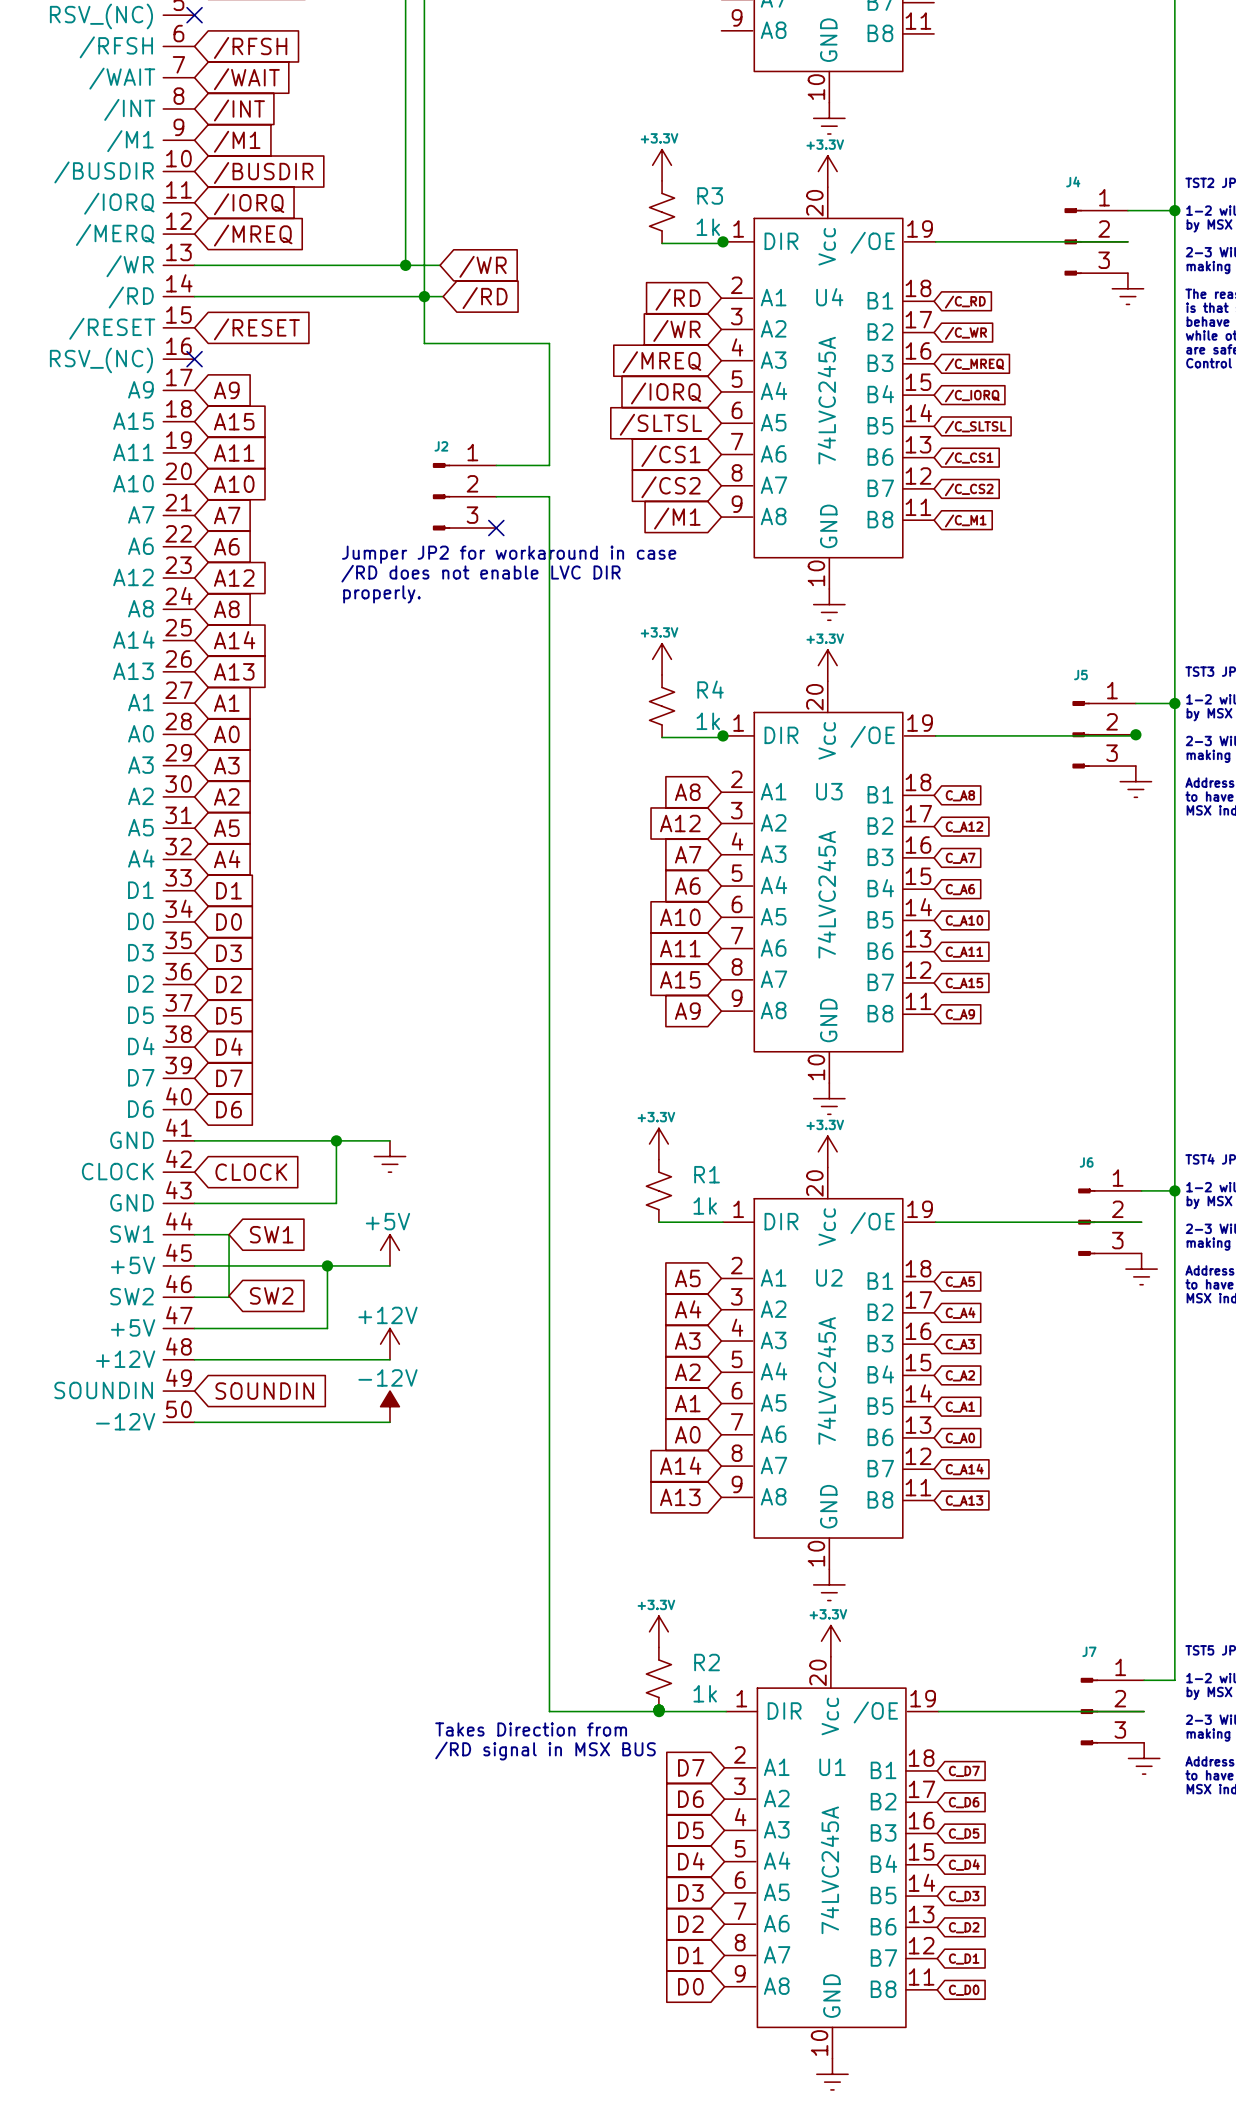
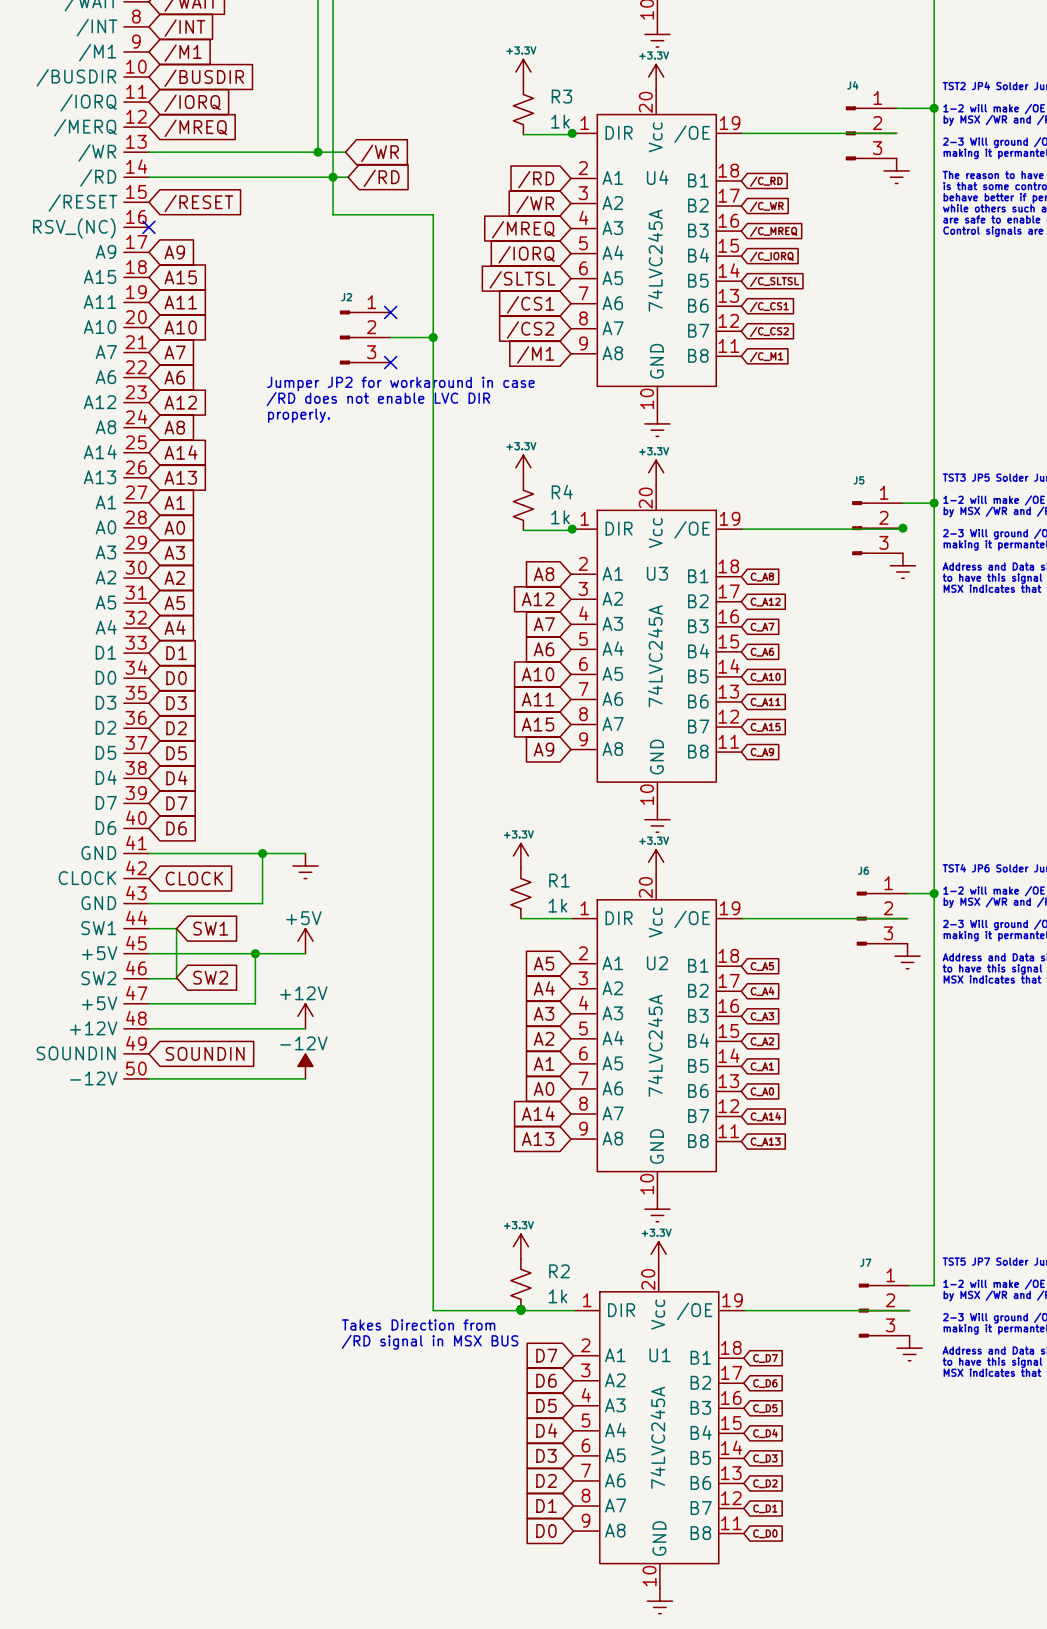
wire: (496, 465) (549, 465) -> (433, 337) (433, 312)
no-connect mark: none -> (390, 312)
junction: none -> (433, 337)

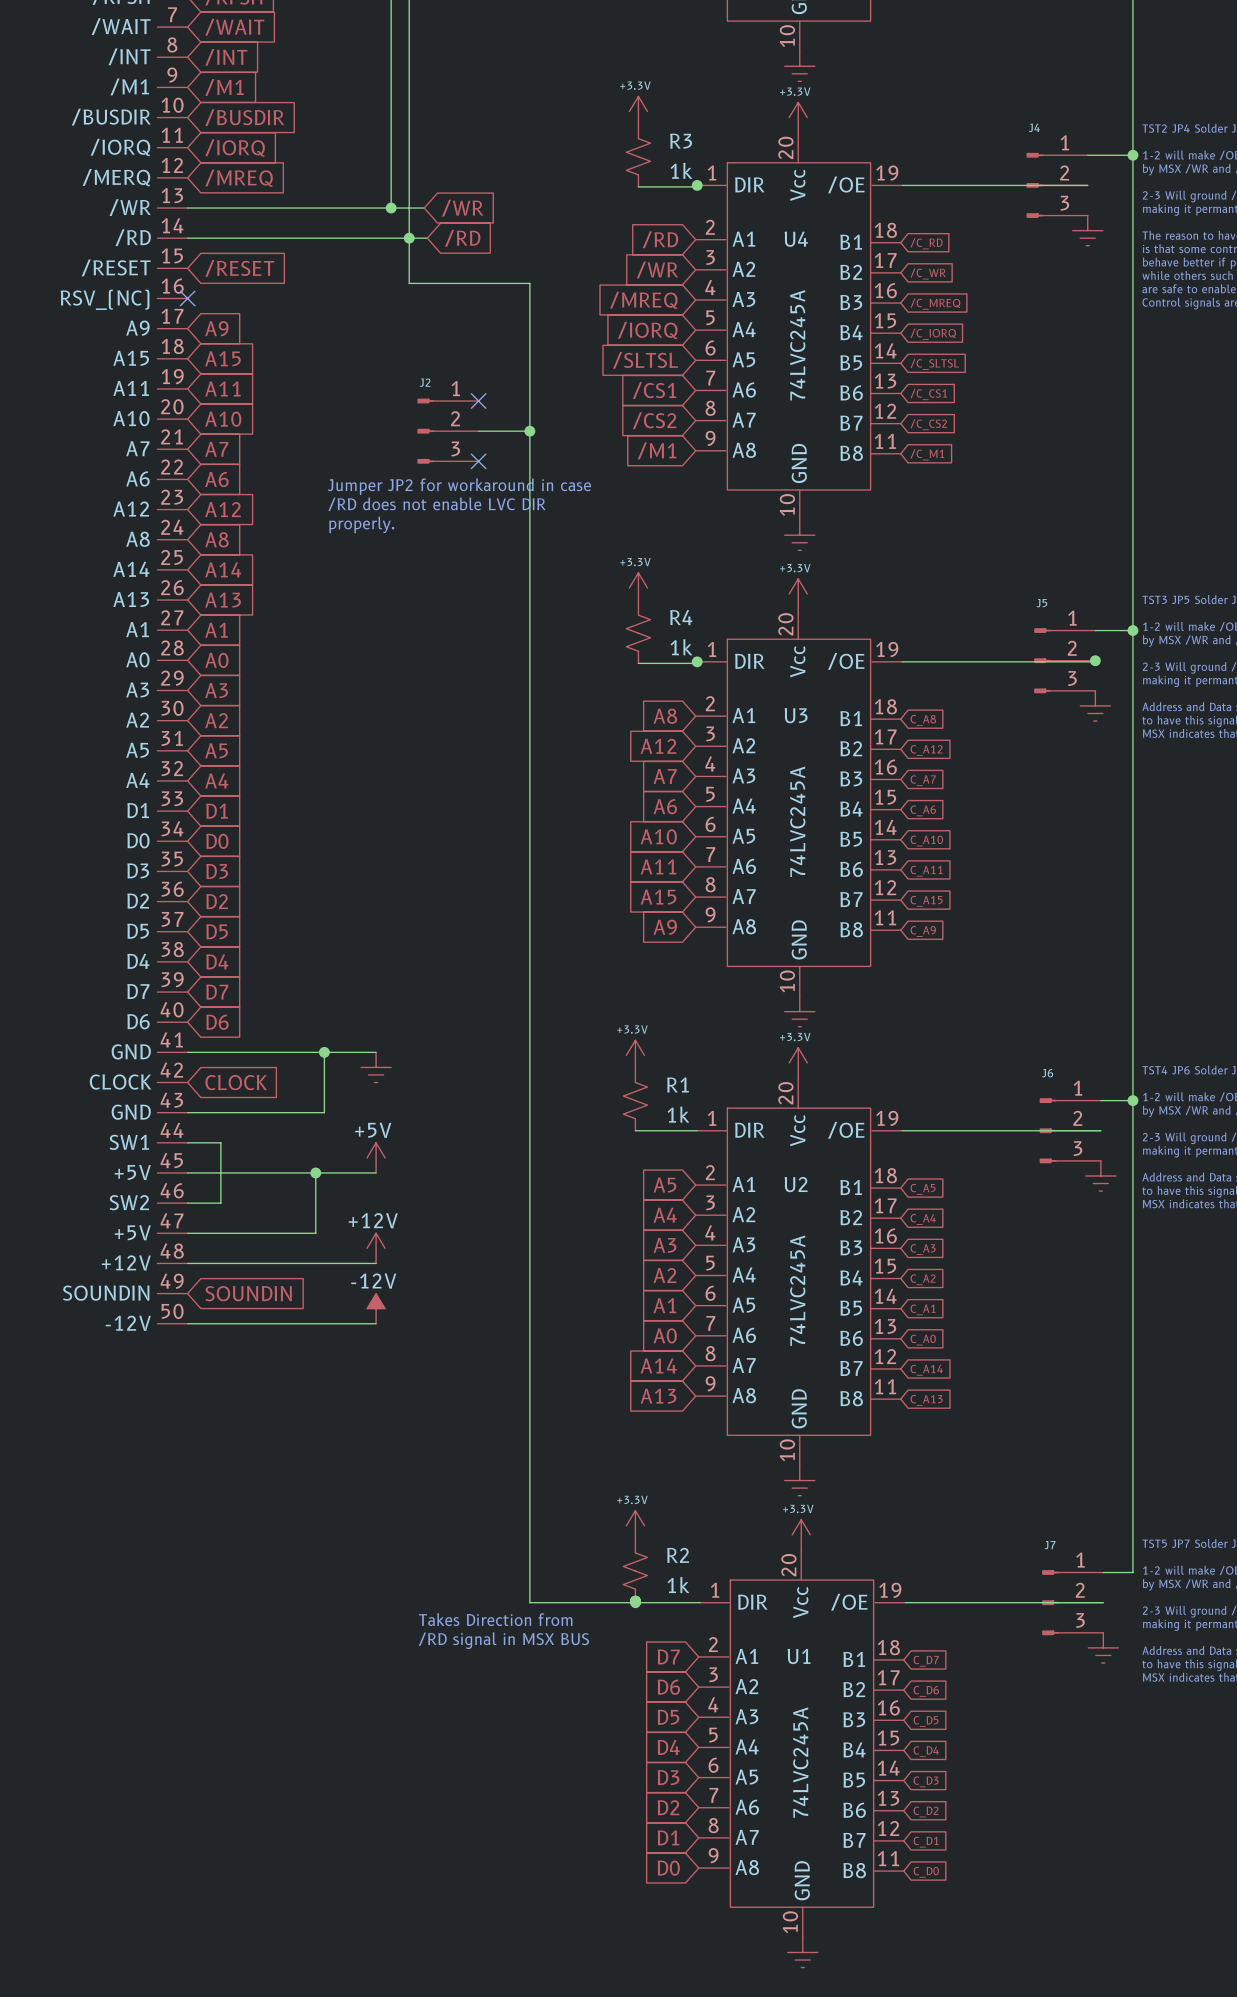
global label: SW1 (210, 928) -> none
global label: SW2 (210, 977) -> none

